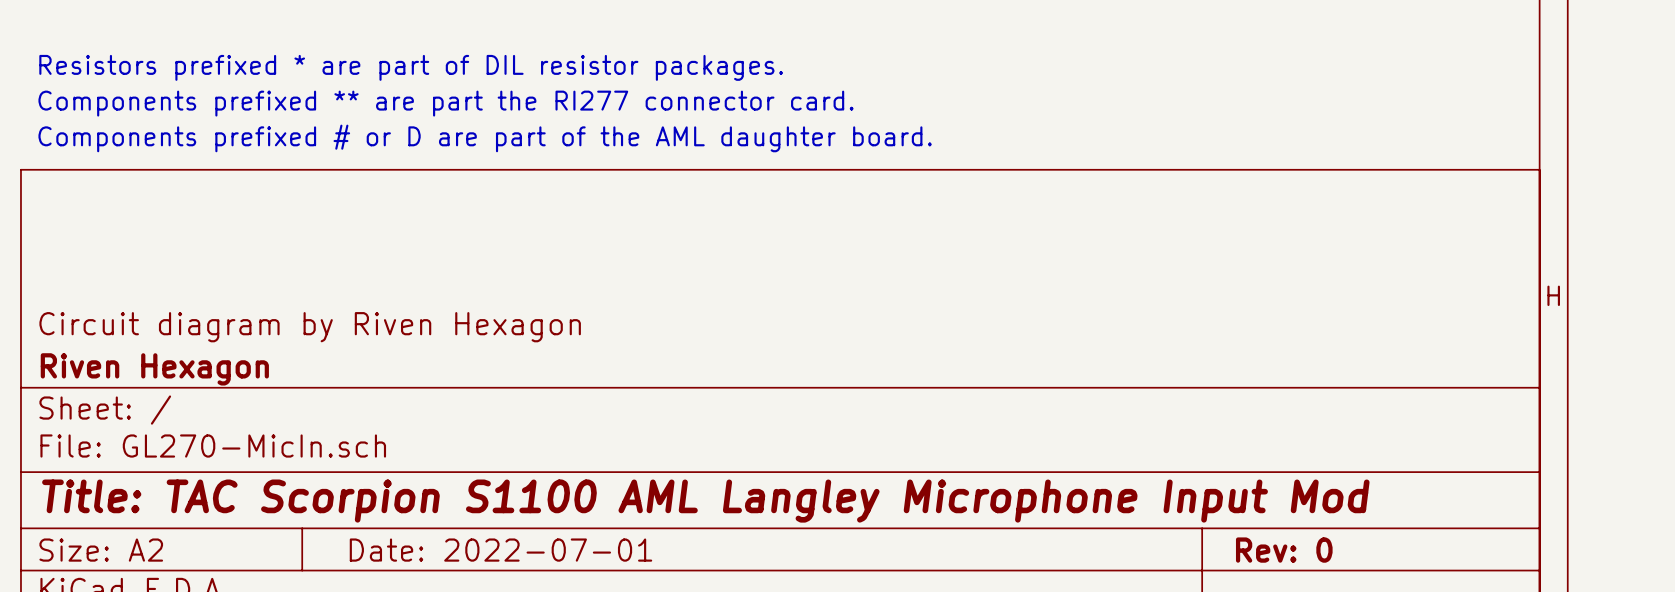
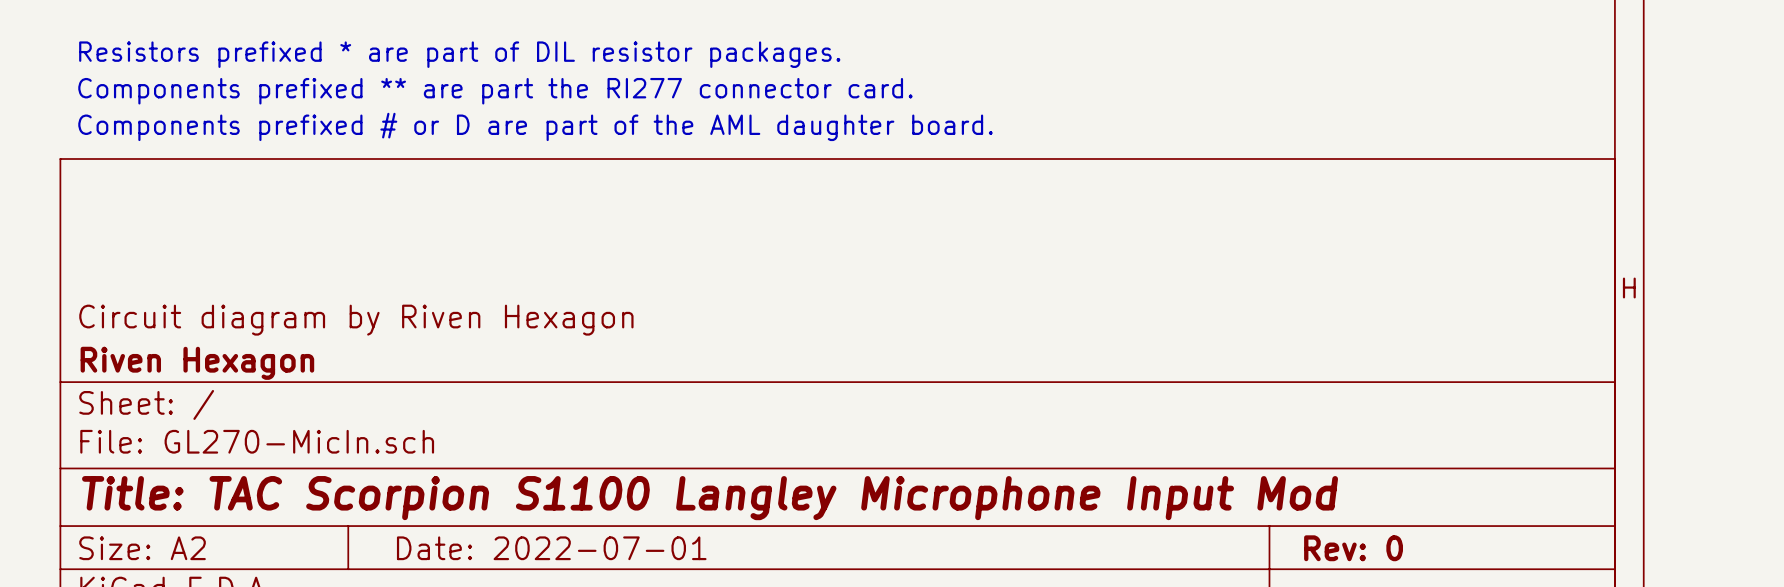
title block: Title: TAC Scorpion S1100 AML Langley Microphone Input Mod (705, 501) -> Title: TAC Scorpion S1100 Langley Microphone Input Mod (710, 498)

